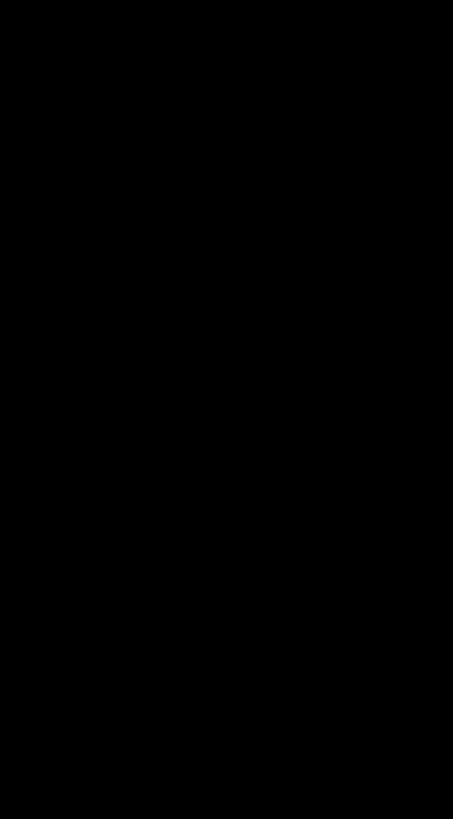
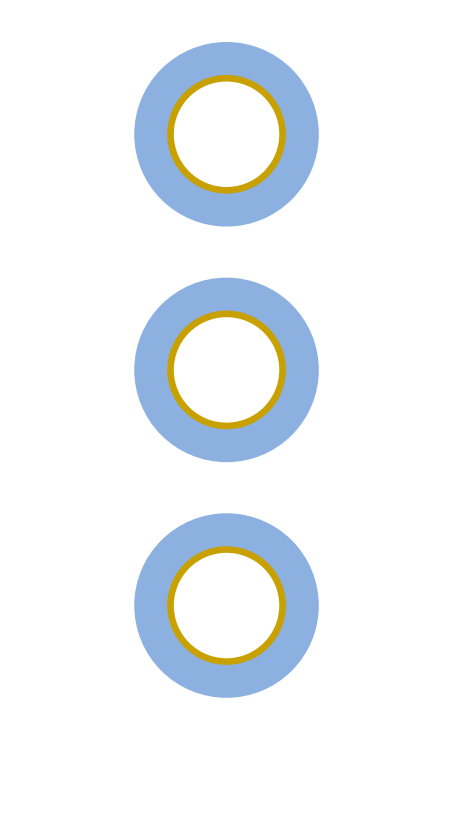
part: none -> (226, 134)
part: none -> (226, 369)
part: none -> (226, 605)

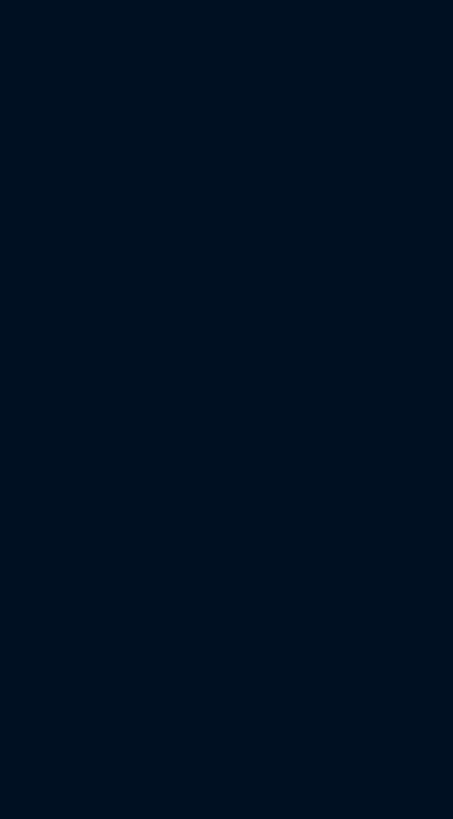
part: (226, 134) -> none
part: (226, 369) -> none
part: (226, 605) -> none

